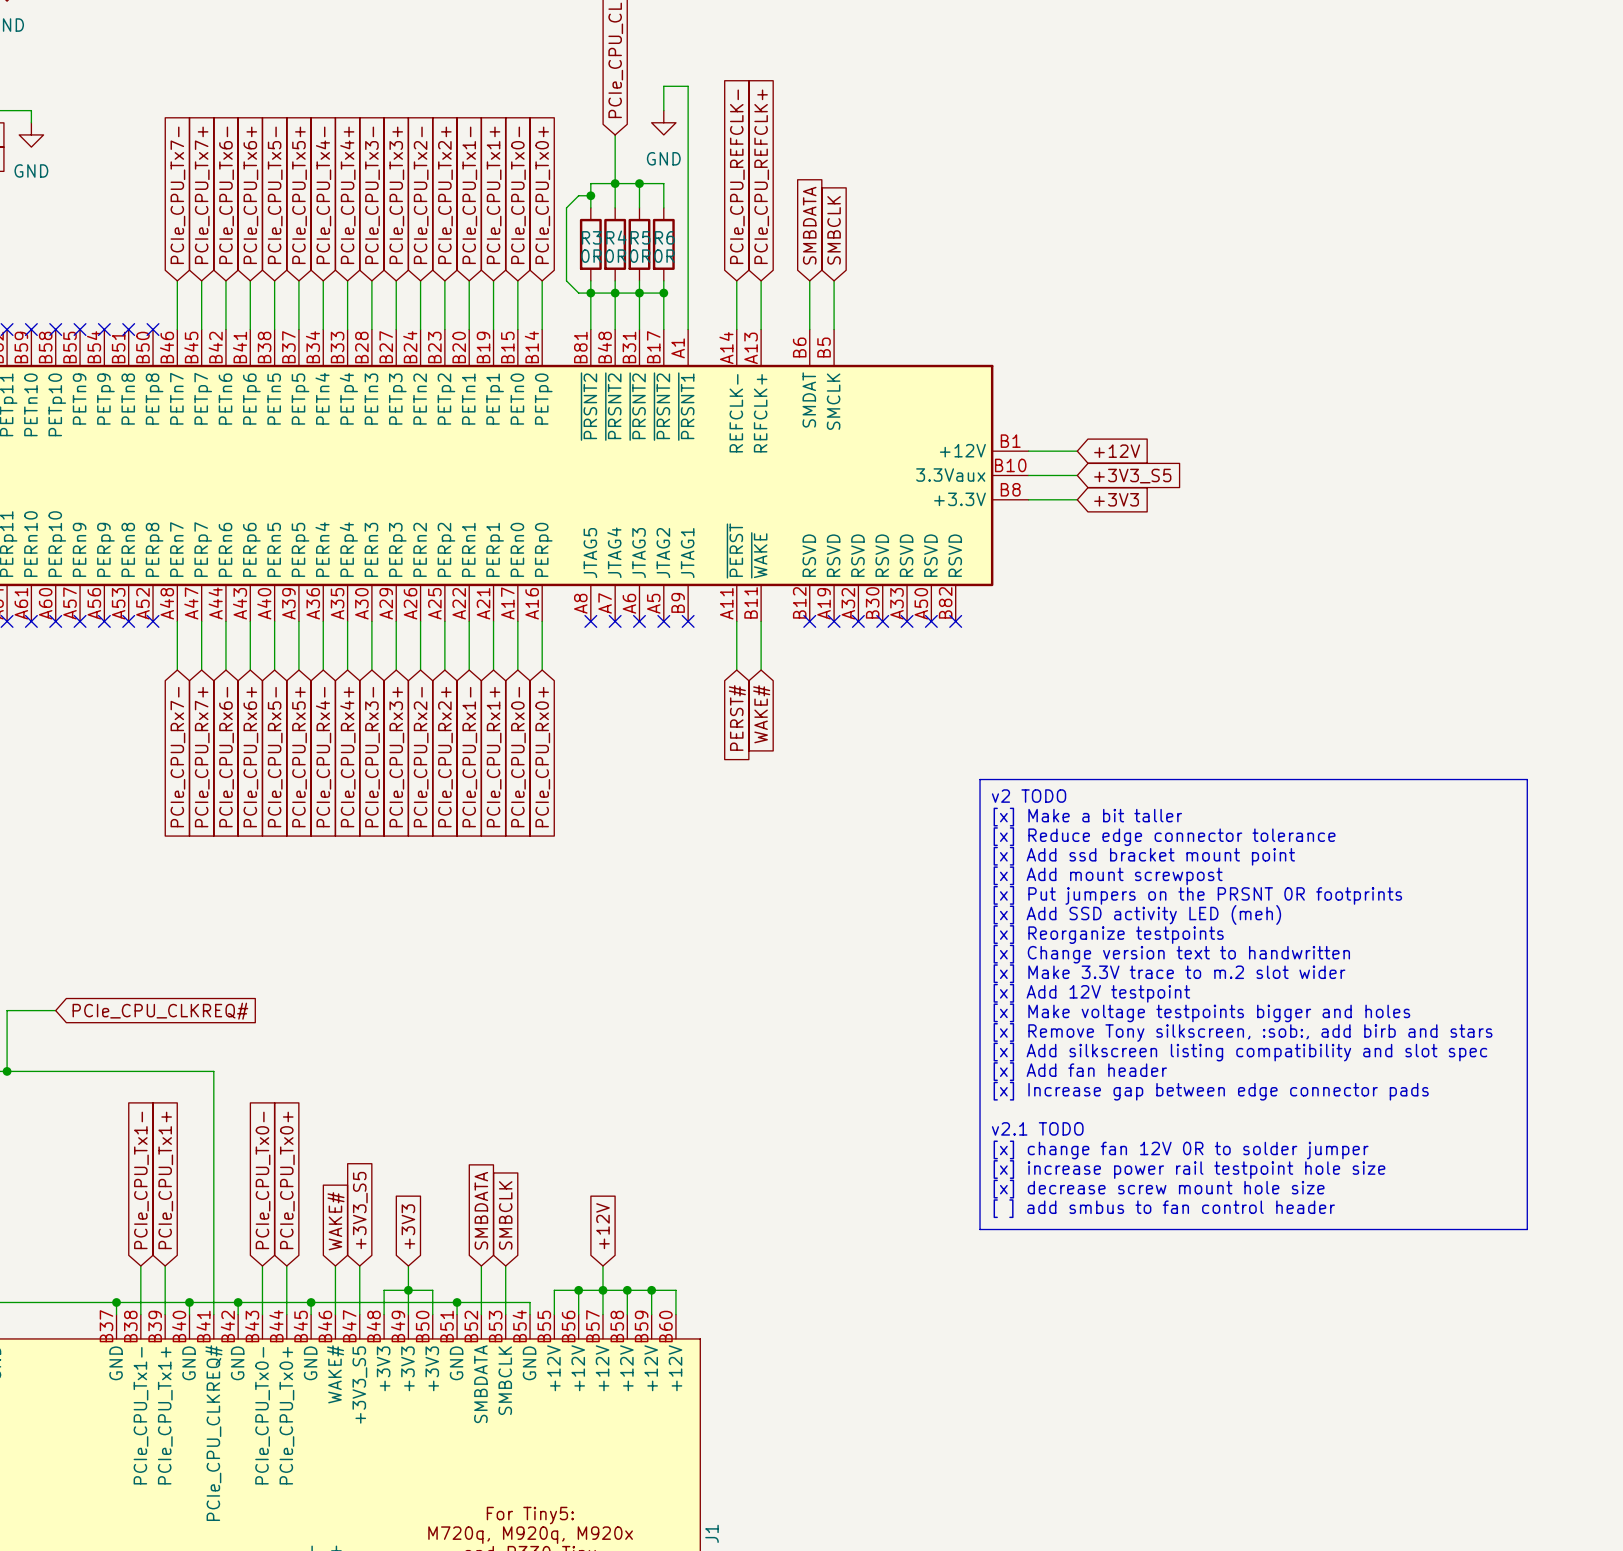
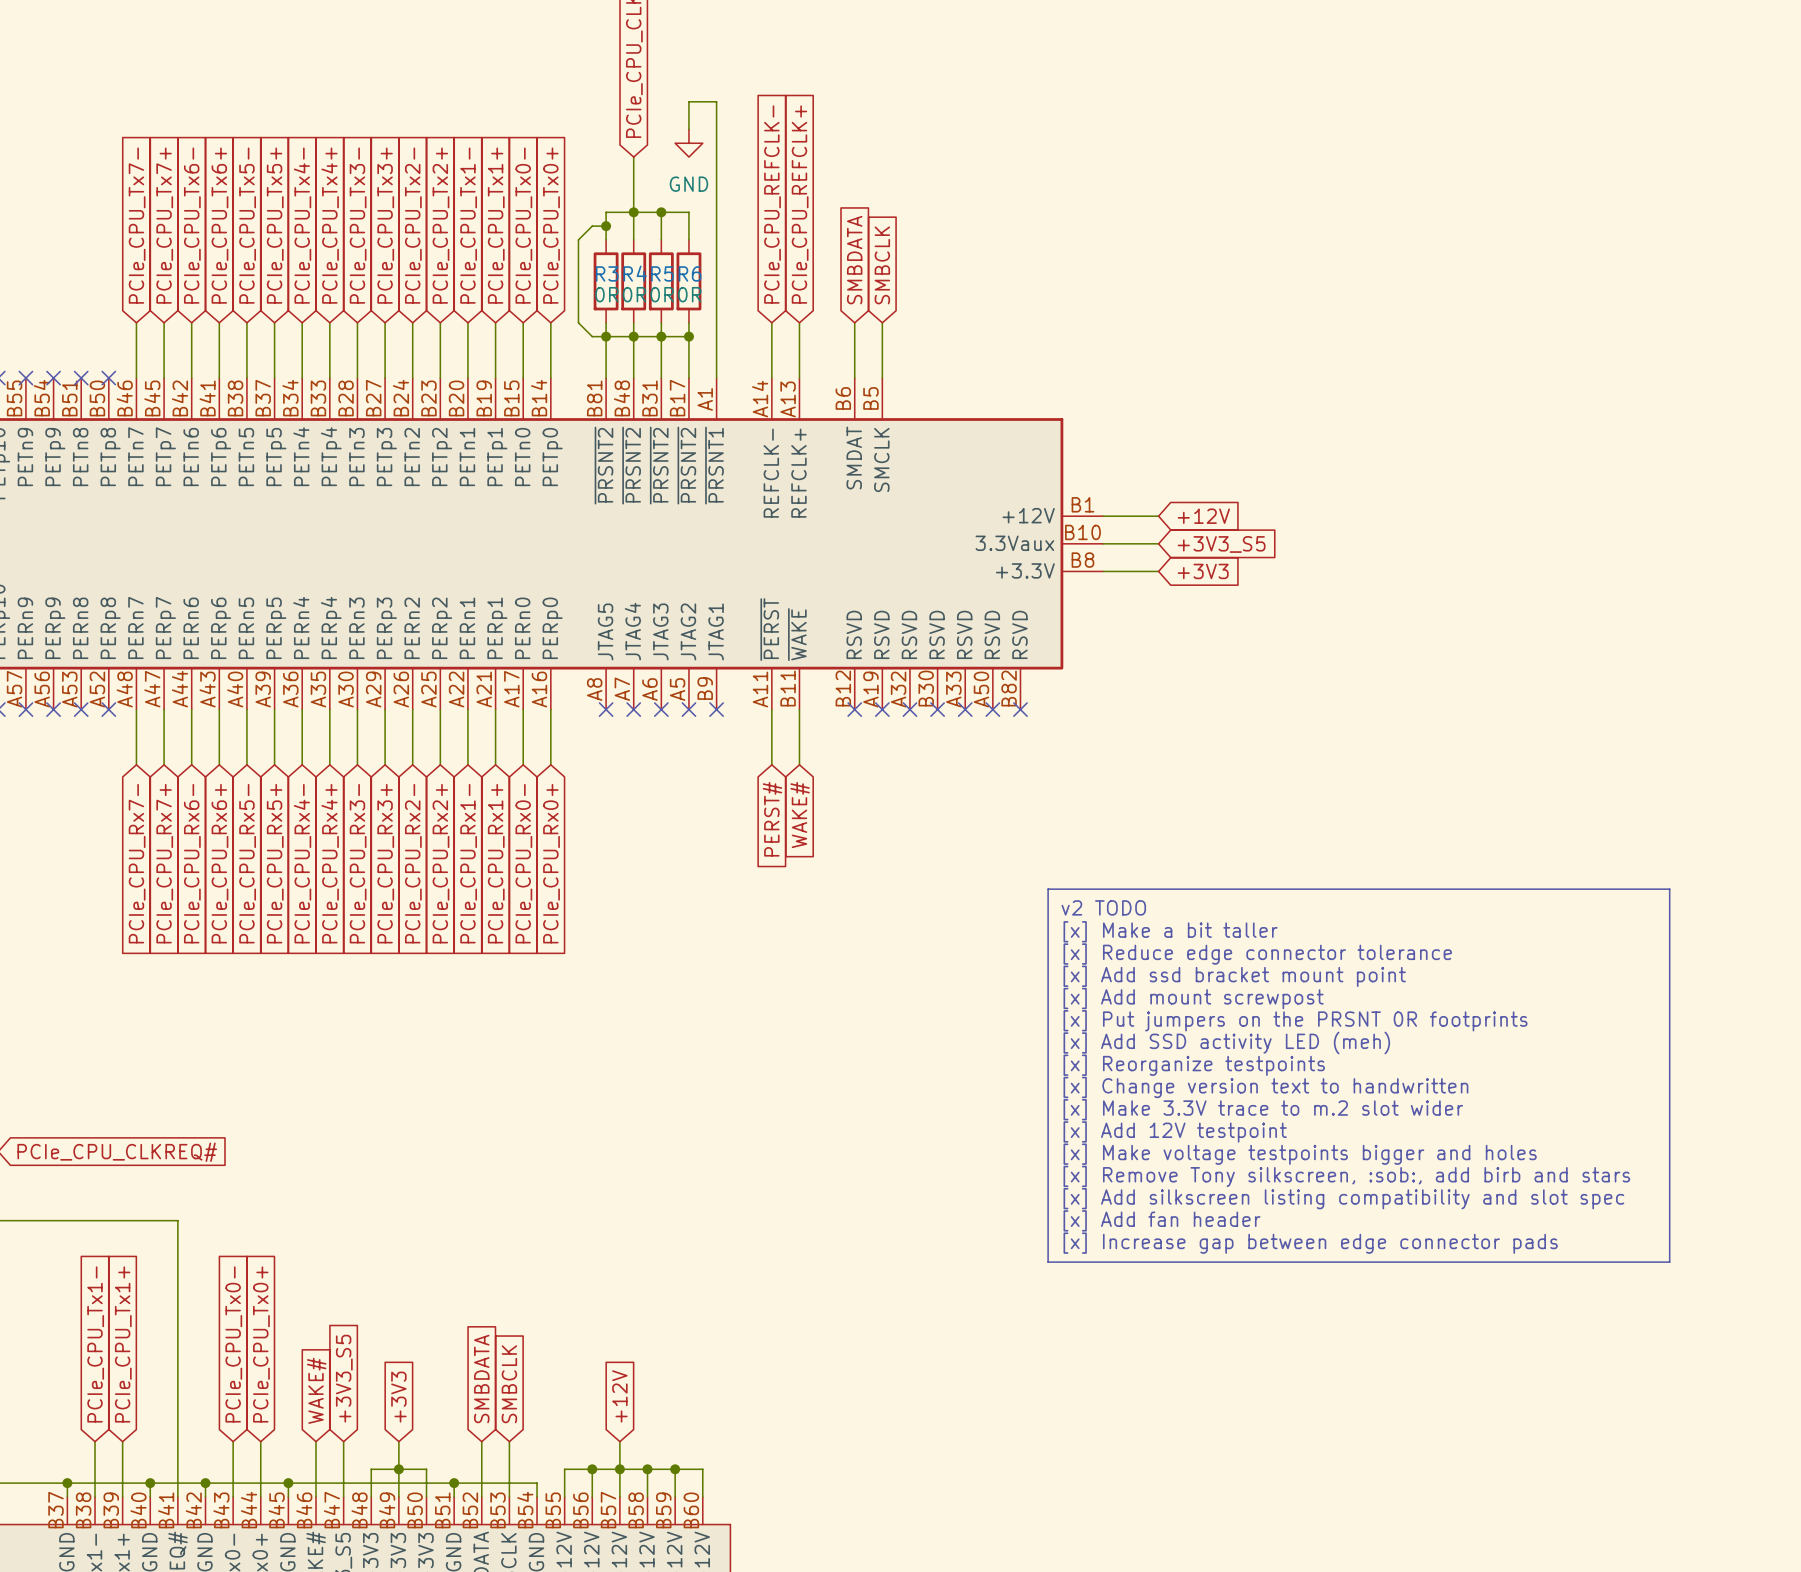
line: (980, 1107) (980, 1229) (1527, 1229) (1527, 1107) -> (1048, 1262) (1669, 1262)
text: v2.1 TODO (1037, 1128) -> none
text: [x] change fan 12V 0R to solder jumper (1181, 1149) -> none
text: [x] increase power rail testpoint hole size (1189, 1169) -> none
text: [x] decrease screw mount hole size (1159, 1189) -> none
text: [ ] add smbus to fan control header (1164, 1208) -> none

